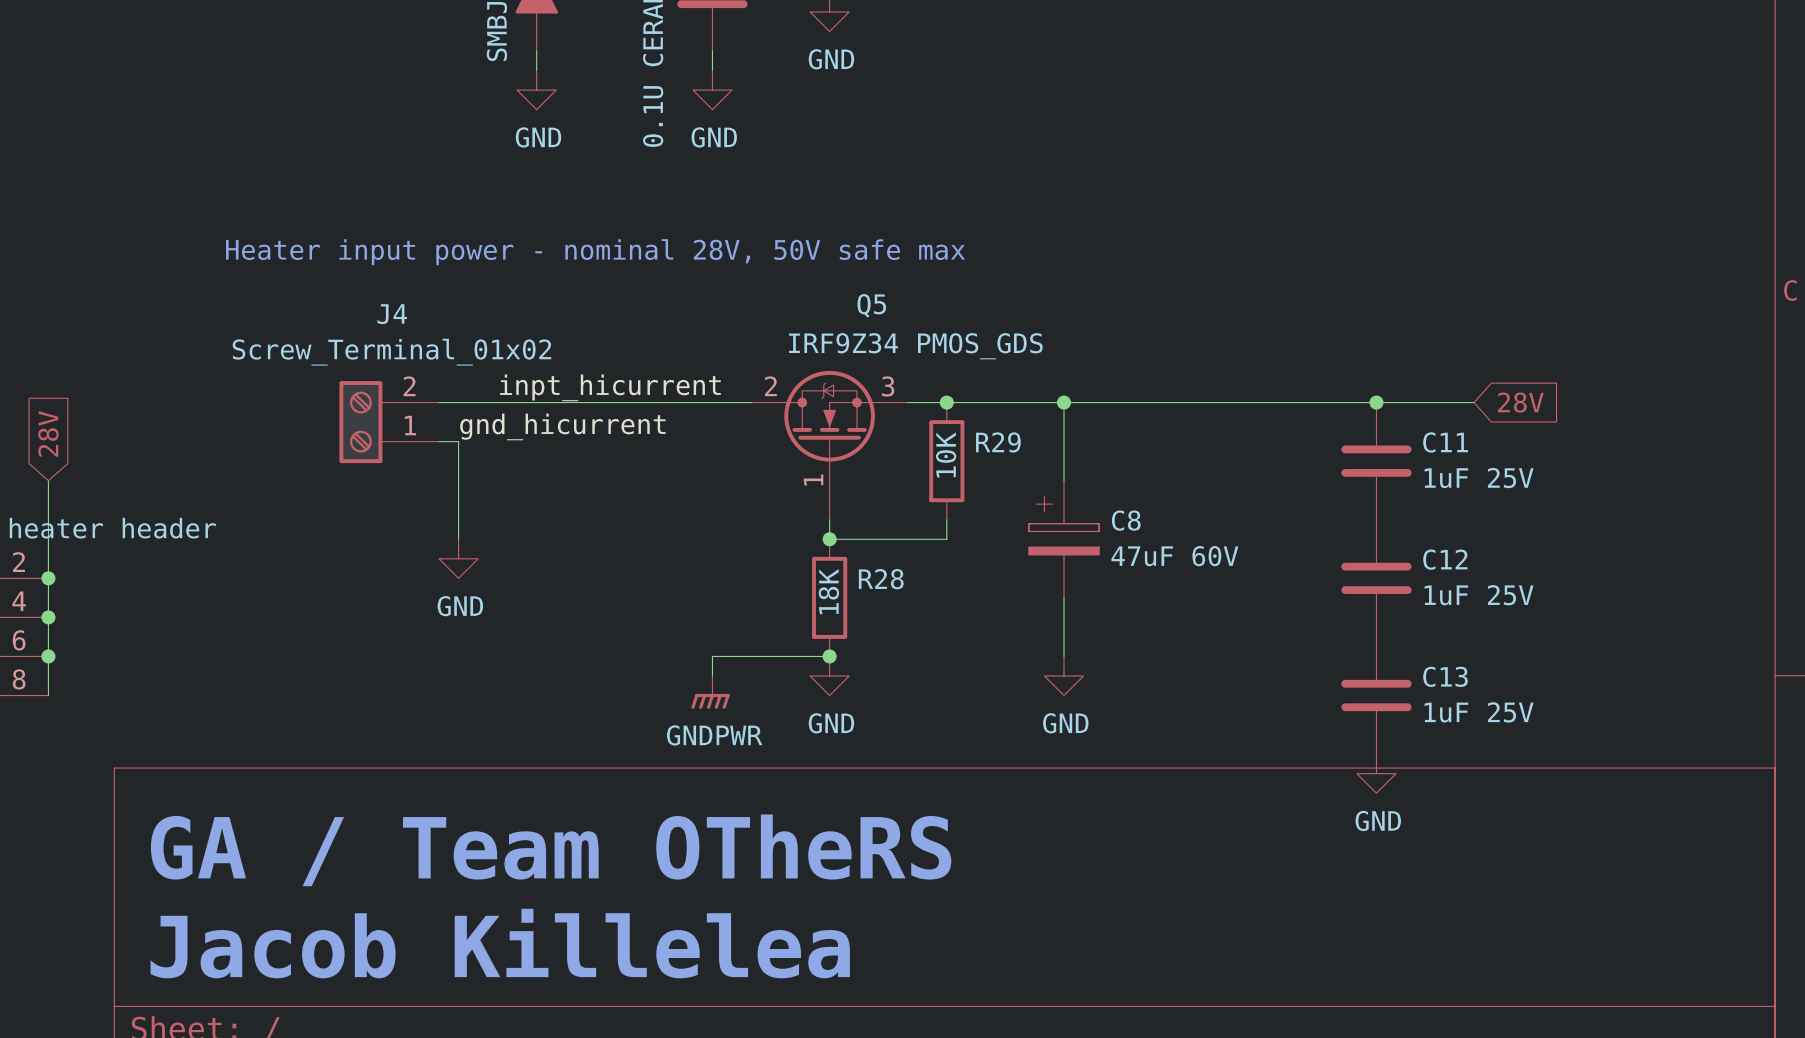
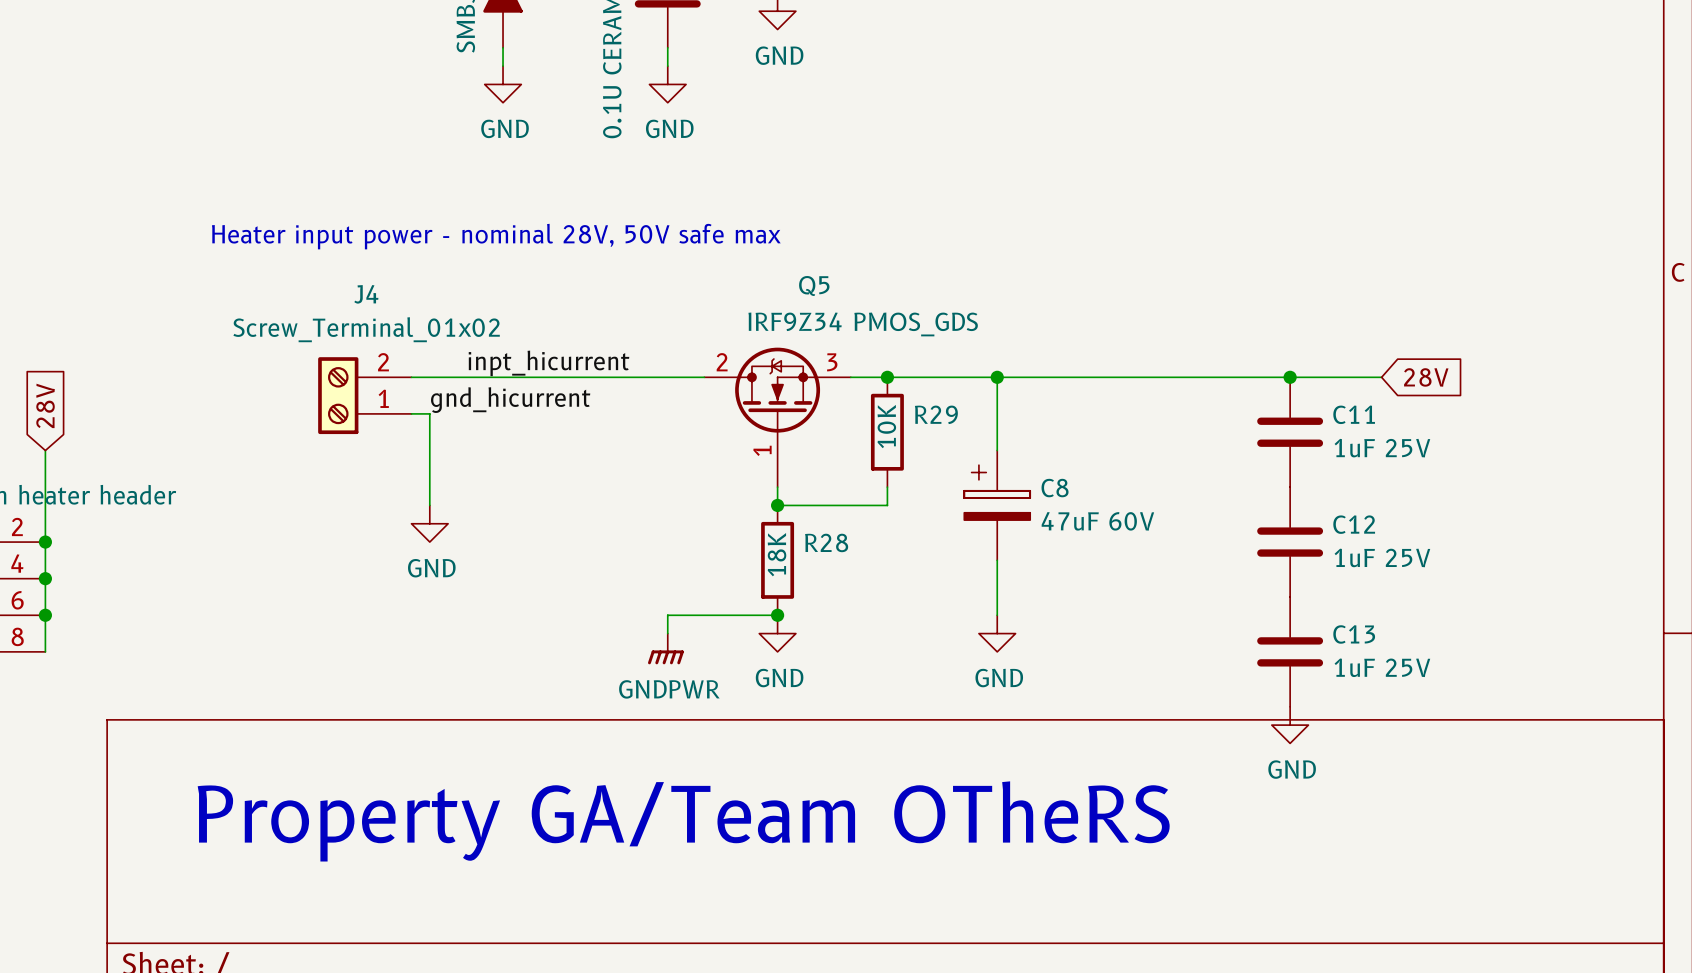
text: GA / Team OTheRS (551, 850) -> Property GA/Team OTheRS (683, 821)
text: Jacob Killelea (500, 943) -> none

